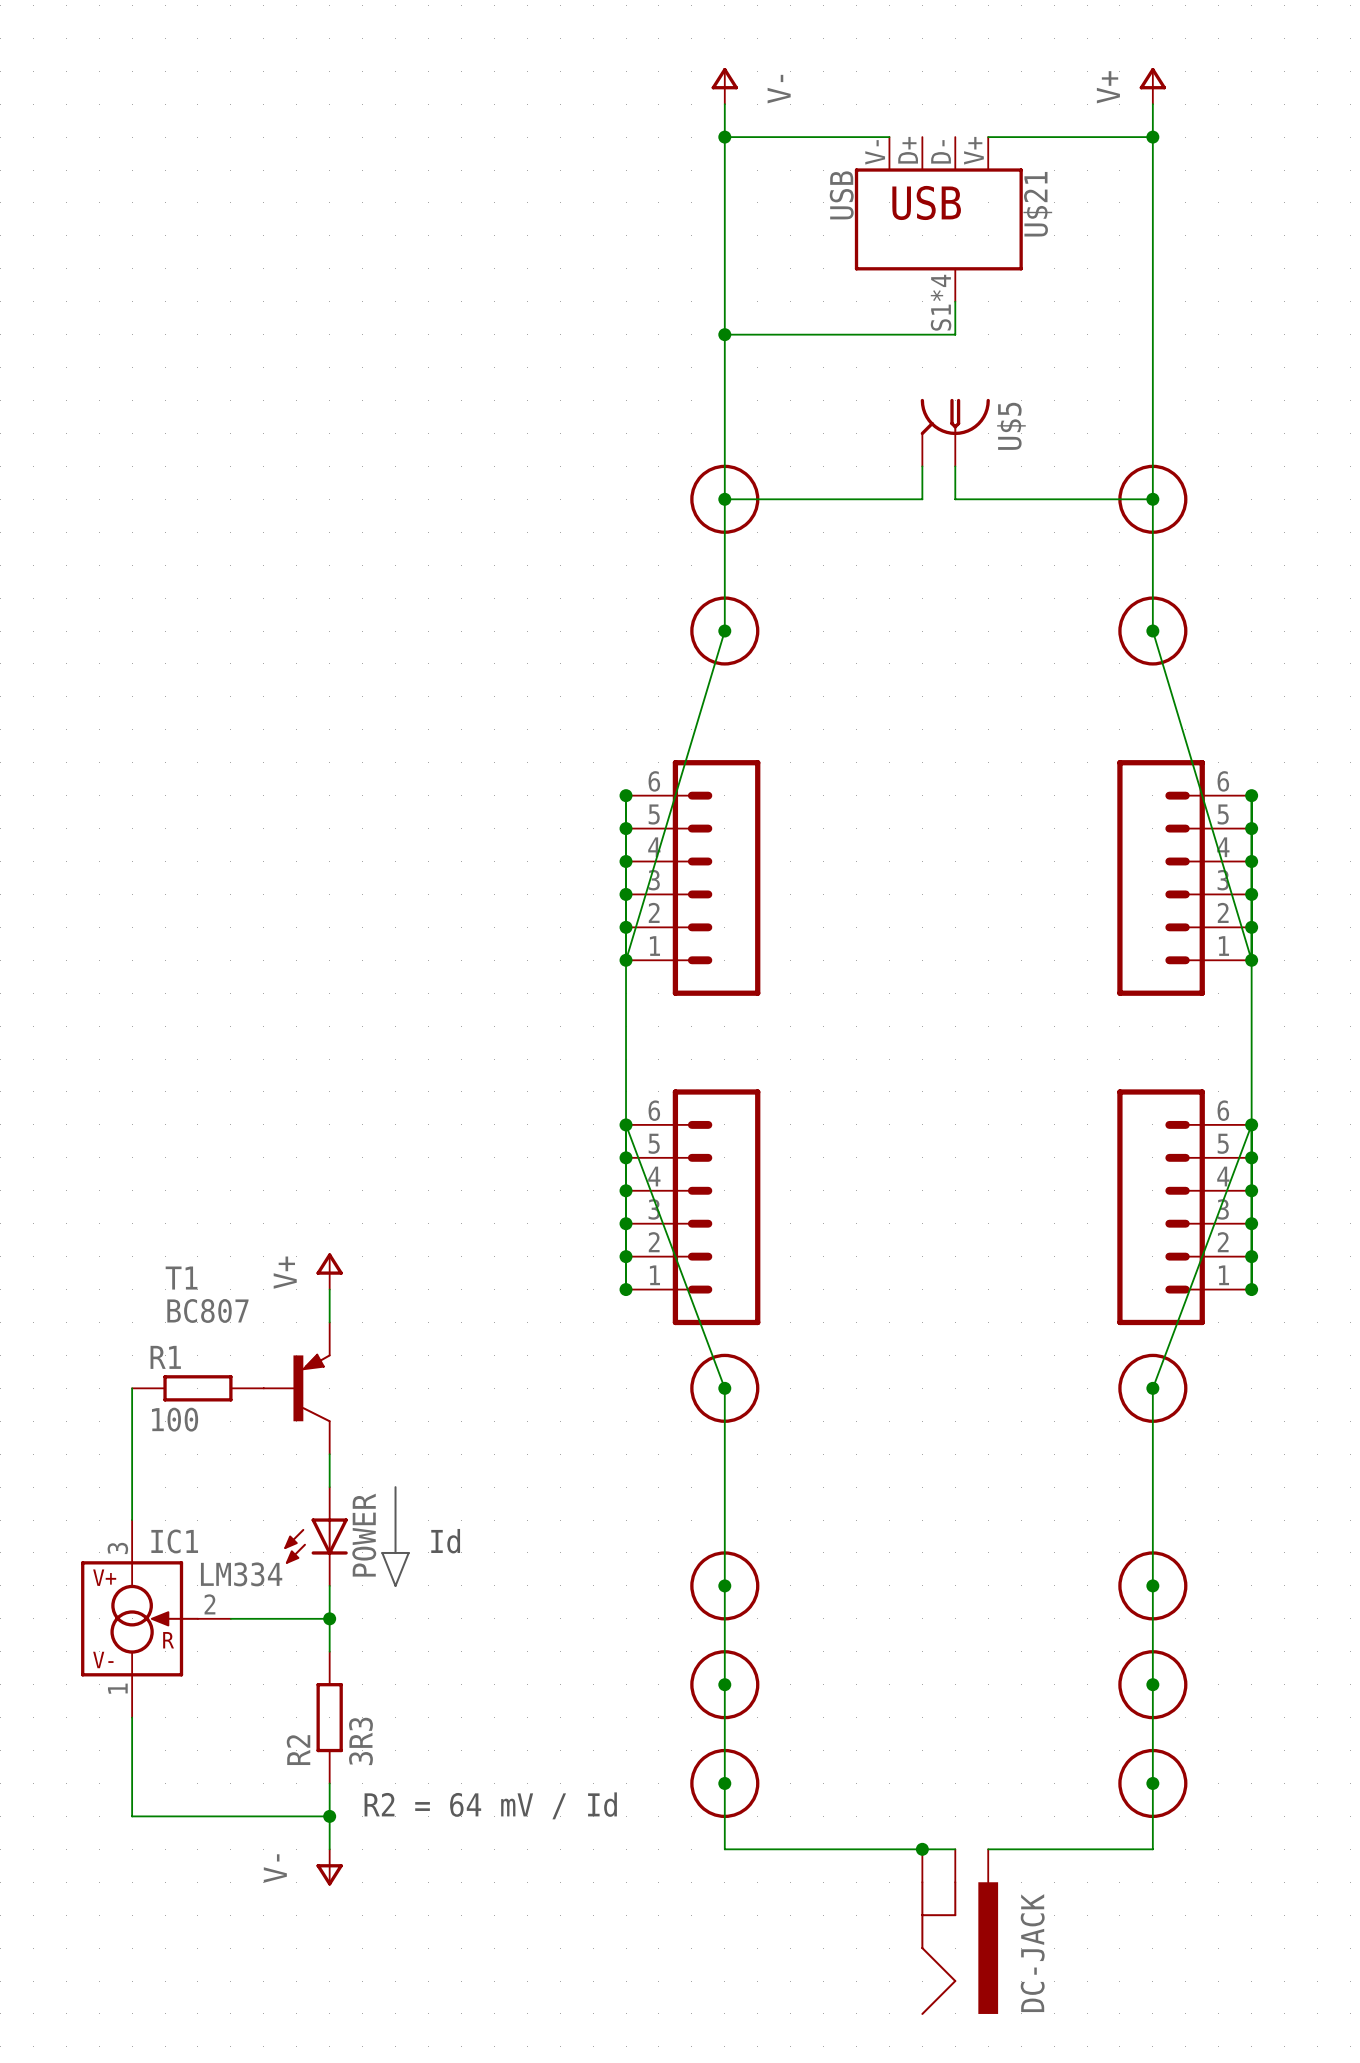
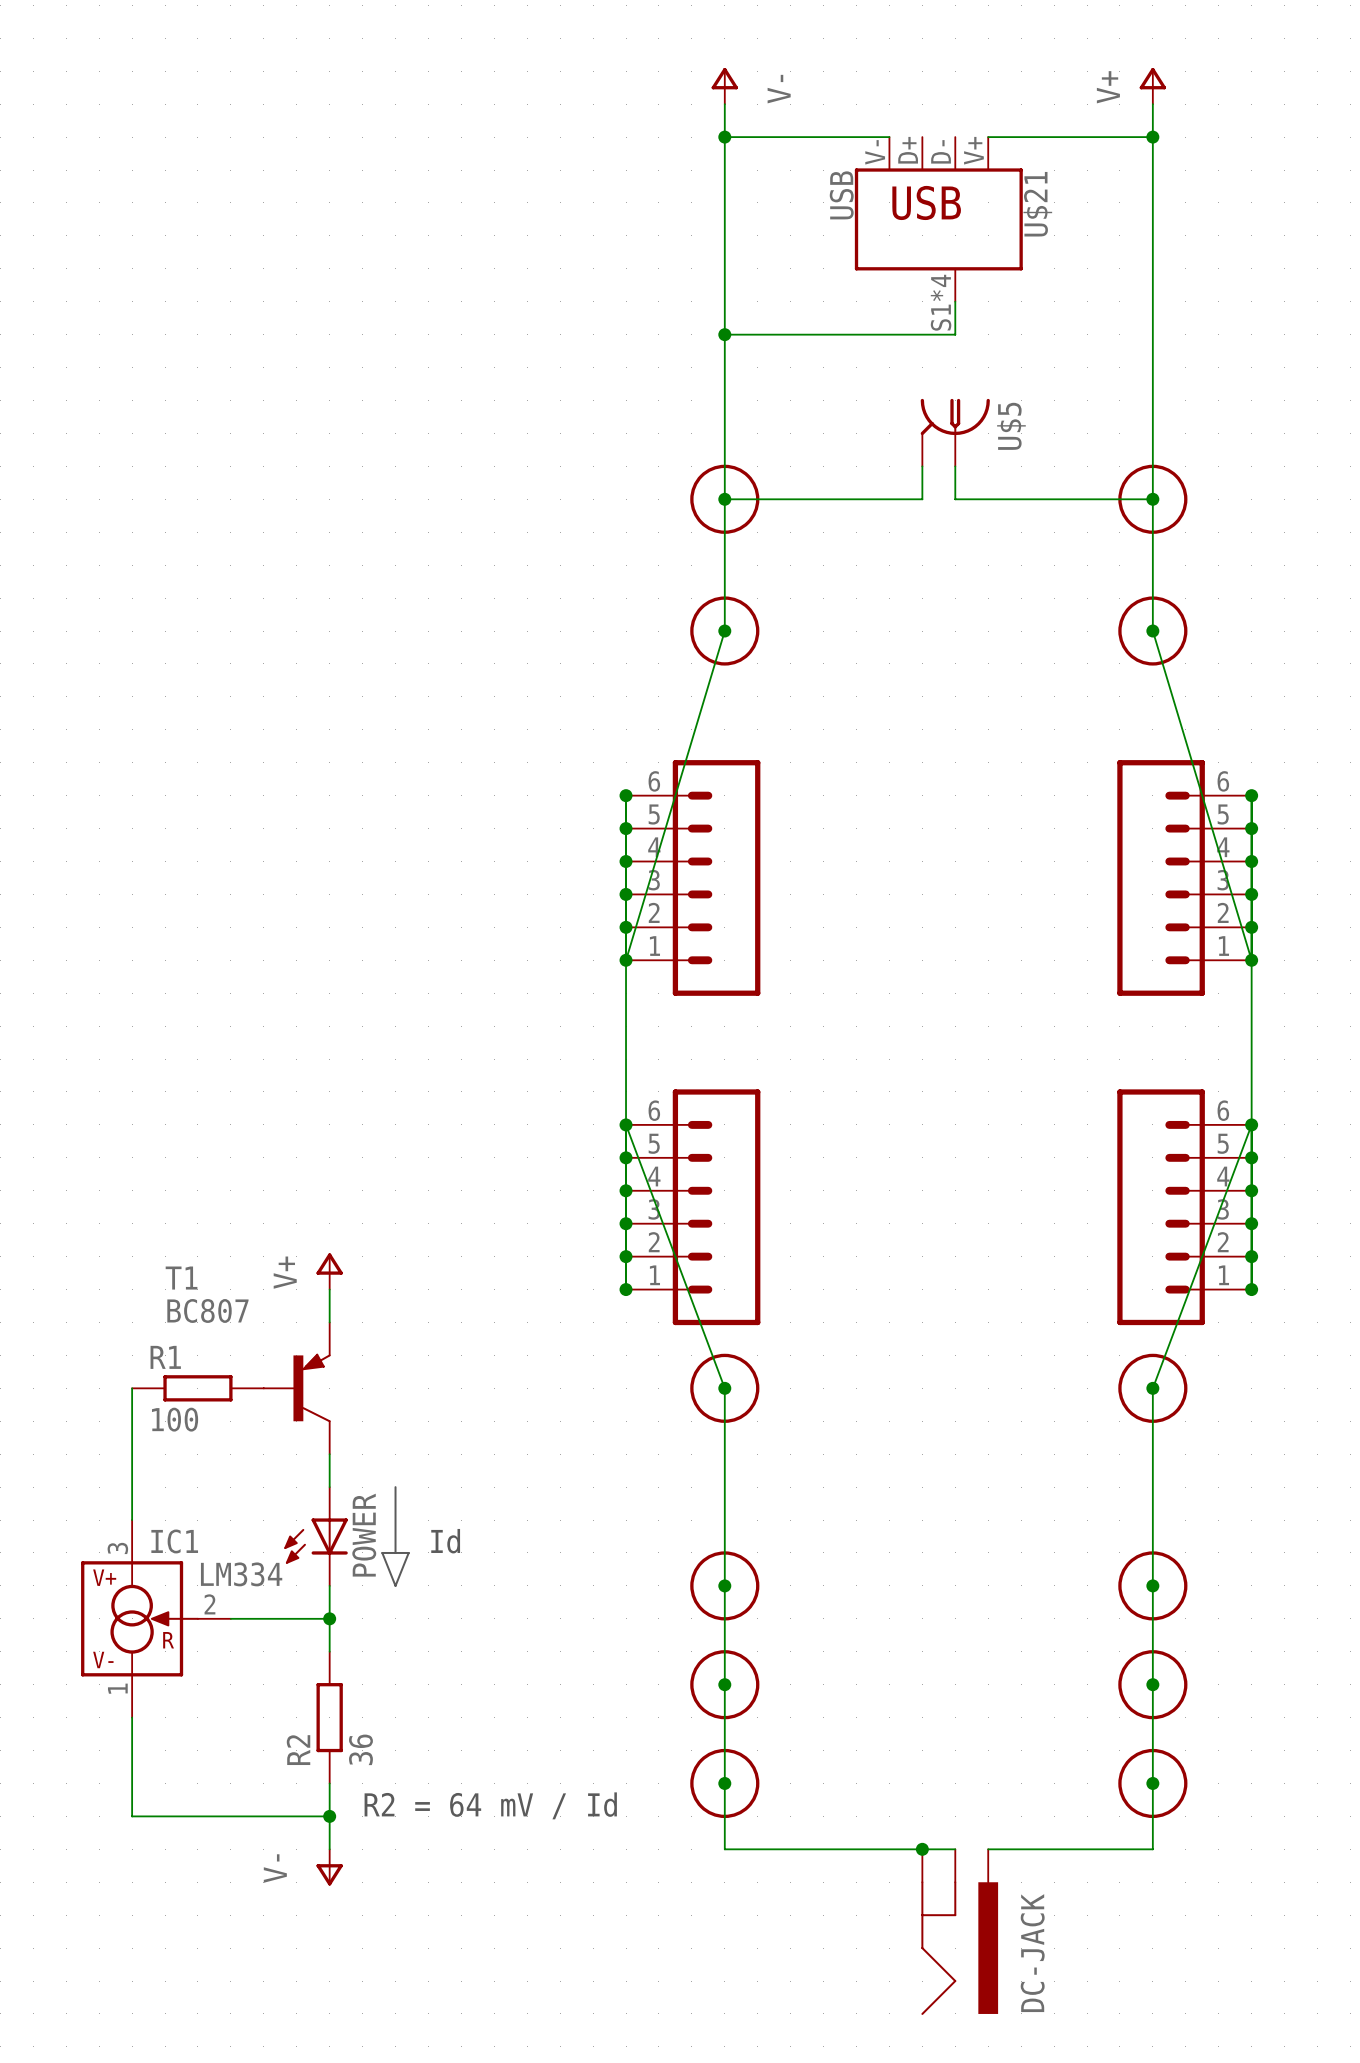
R2 value: 3R3 (360, 1741) -> 36 (360, 1749)

